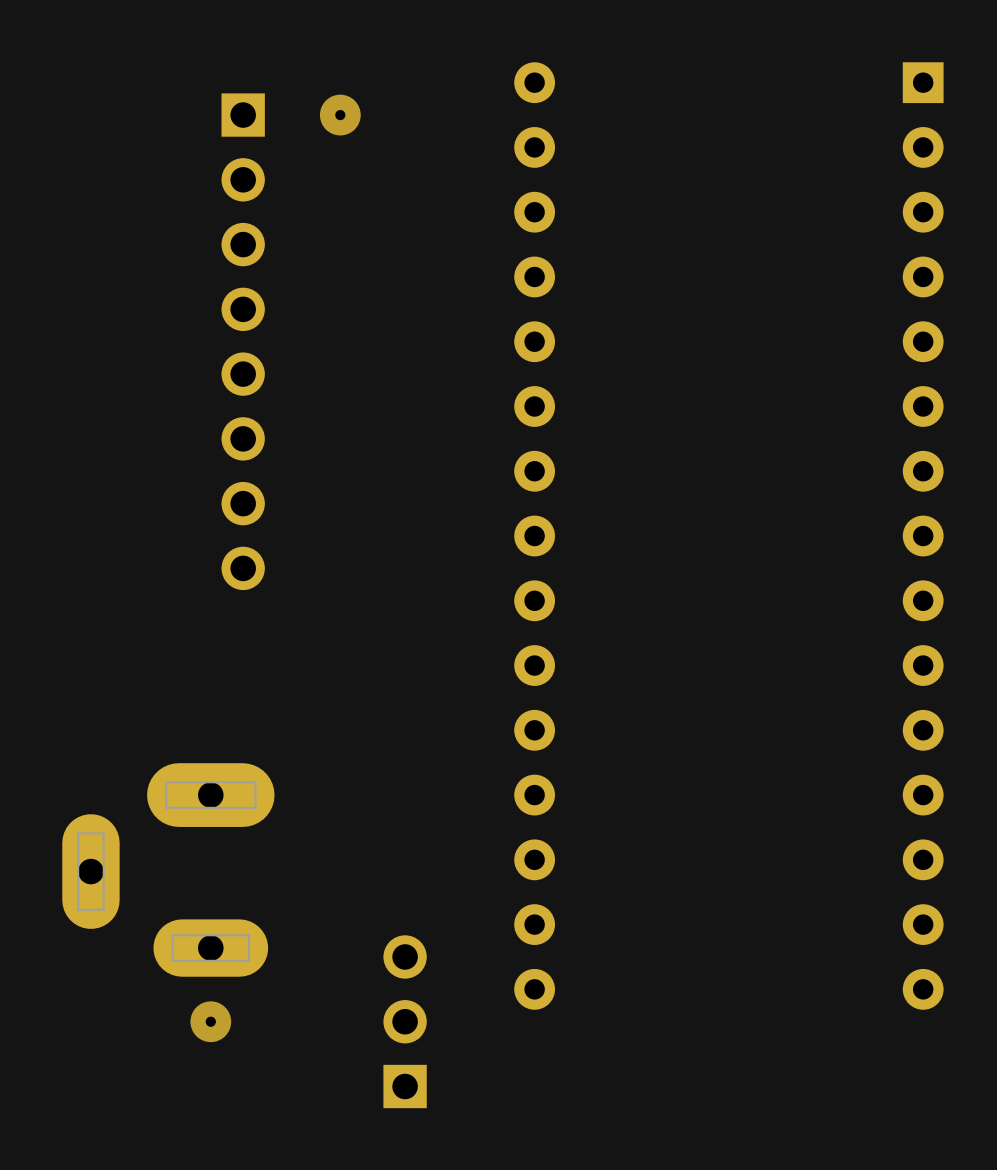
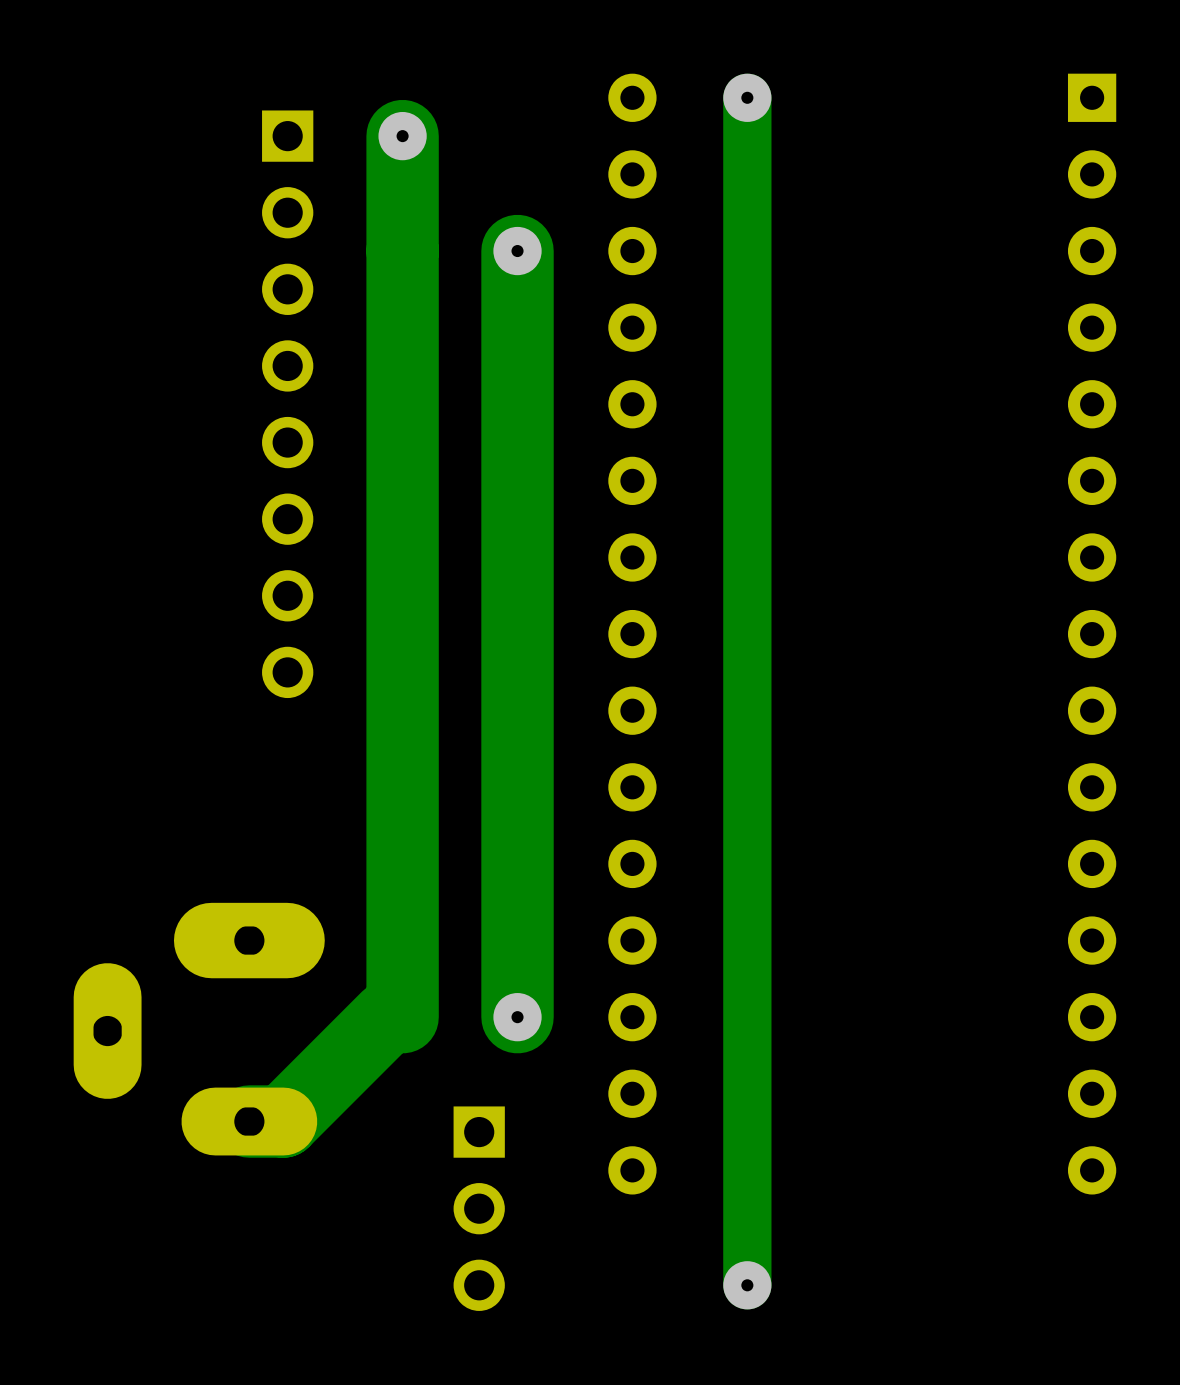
track: none -> (747, 97) (747, 1285)
via: none -> (747, 97)
track: none -> (402, 136) (402, 1017) (387, 1017) (283, 1121) (249, 1121)
track: none -> (517, 251) (517, 1017)
via: none -> (517, 251)
via: none -> (517, 1017)
via: (210, 1021) -> none
part rotation: 0° (405, 1021) -> 180° (479, 1208)
via: none -> (747, 1285)

